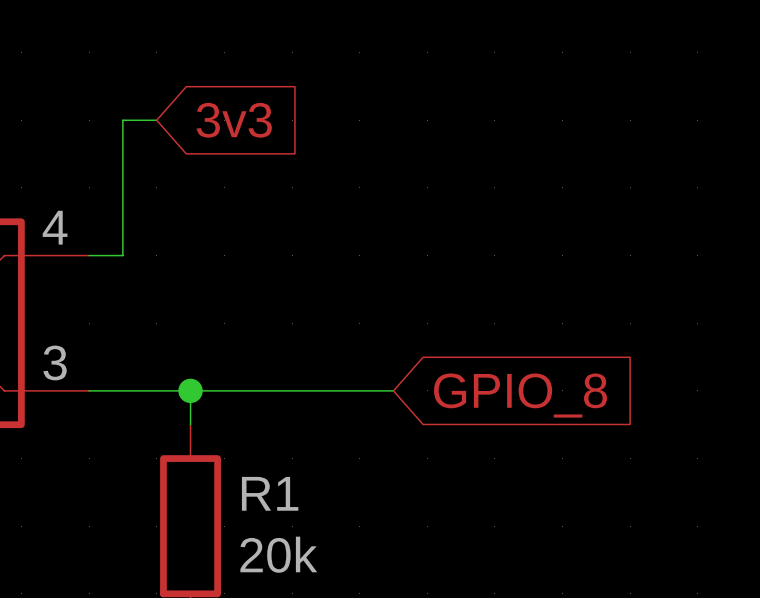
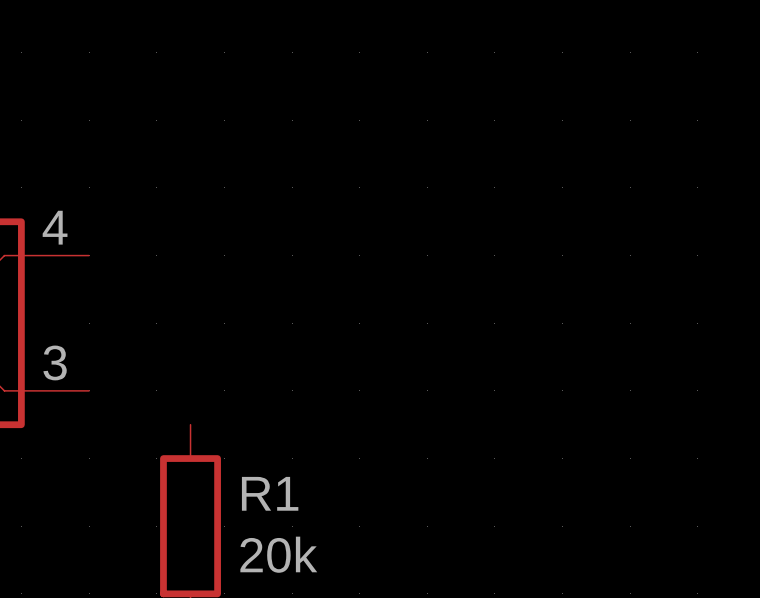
wire: (156, 120) (122, 120) (122, 255) (89, 255) -> none
global label: 3v3 (234, 120) -> none
wire: (89, 390) (393, 390) -> none
wire: (190, 390) (190, 424) -> none
junction: (190, 390) -> none
global label: GPIO_8 (520, 395) -> none

